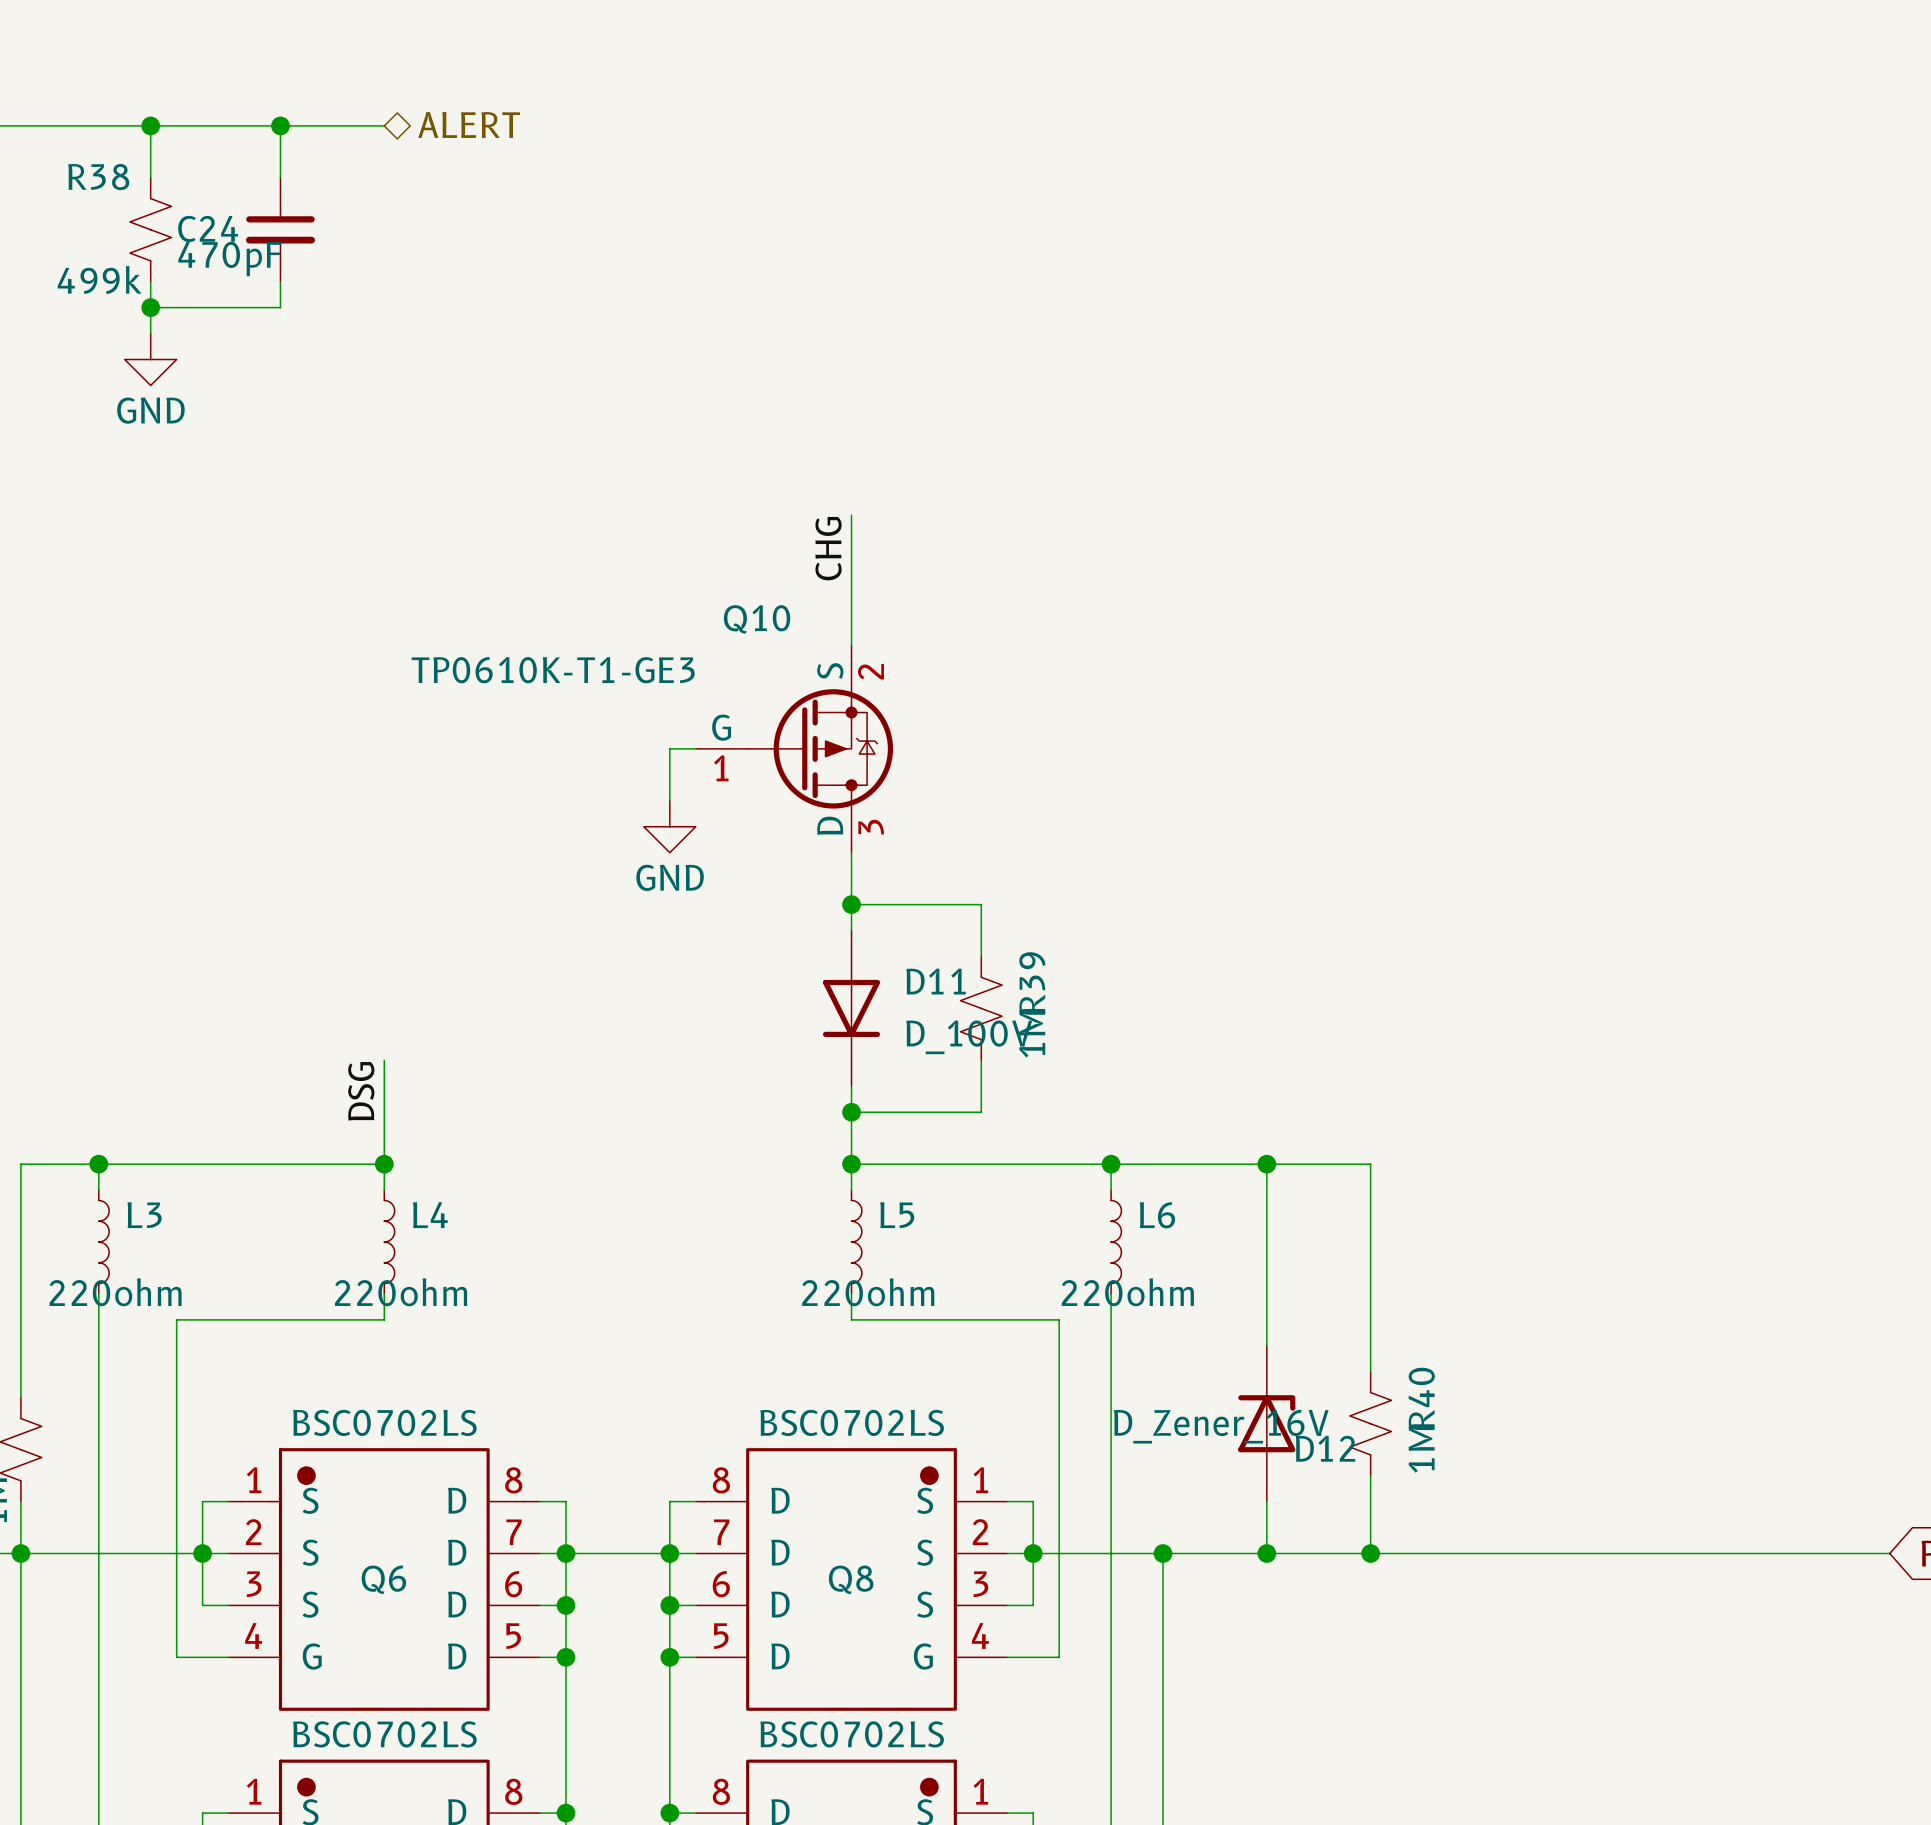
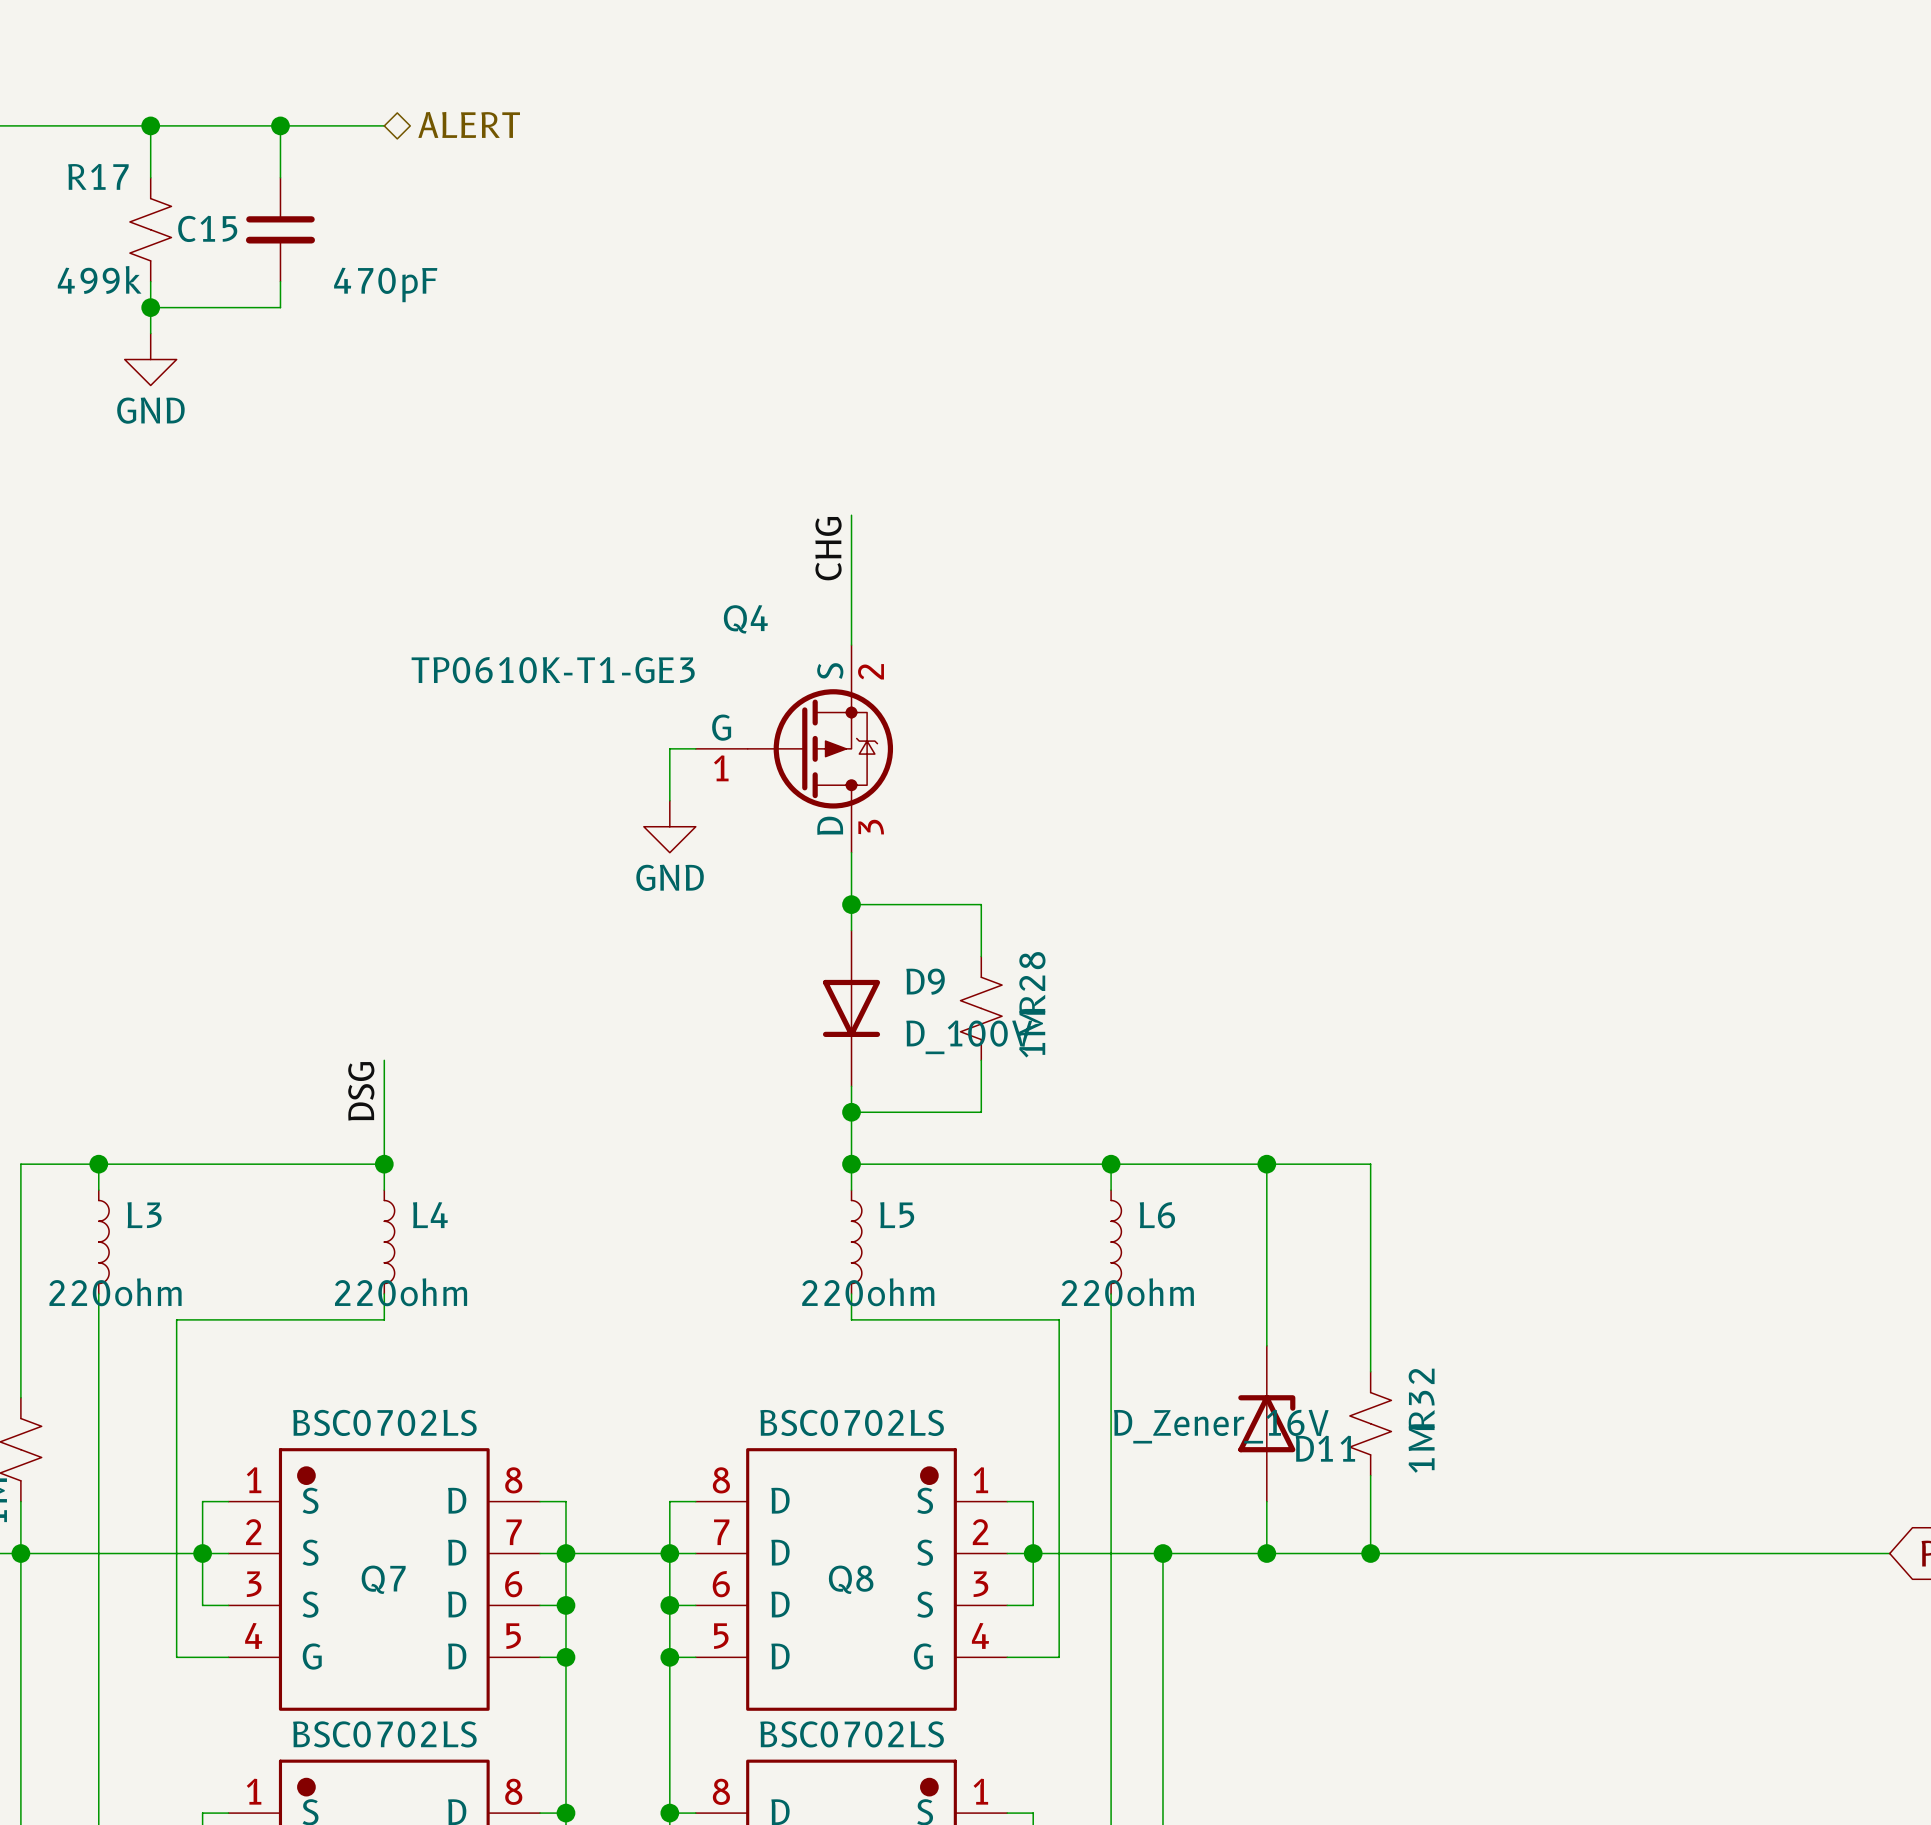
R38 name: R38 (98, 177) -> R17 (98, 176)
C24 name: C24 (208, 228) -> C15 (207, 228)
C24 value position: 470pF (229, 259) -> 470pF (385, 284)
Q10 name: Q10 (757, 619) -> Q4 (745, 619)
D11 name: D11 (936, 981) -> D9 (925, 981)
R39 name: R39 (1032, 982) -> R28 (1032, 982)
R40 name: R40 (1421, 1398) -> R32 (1421, 1398)
D12 name: D12 (1325, 1448) -> D11 (1325, 1448)
Q6 name: Q6 (383, 1579) -> Q7 (383, 1579)

